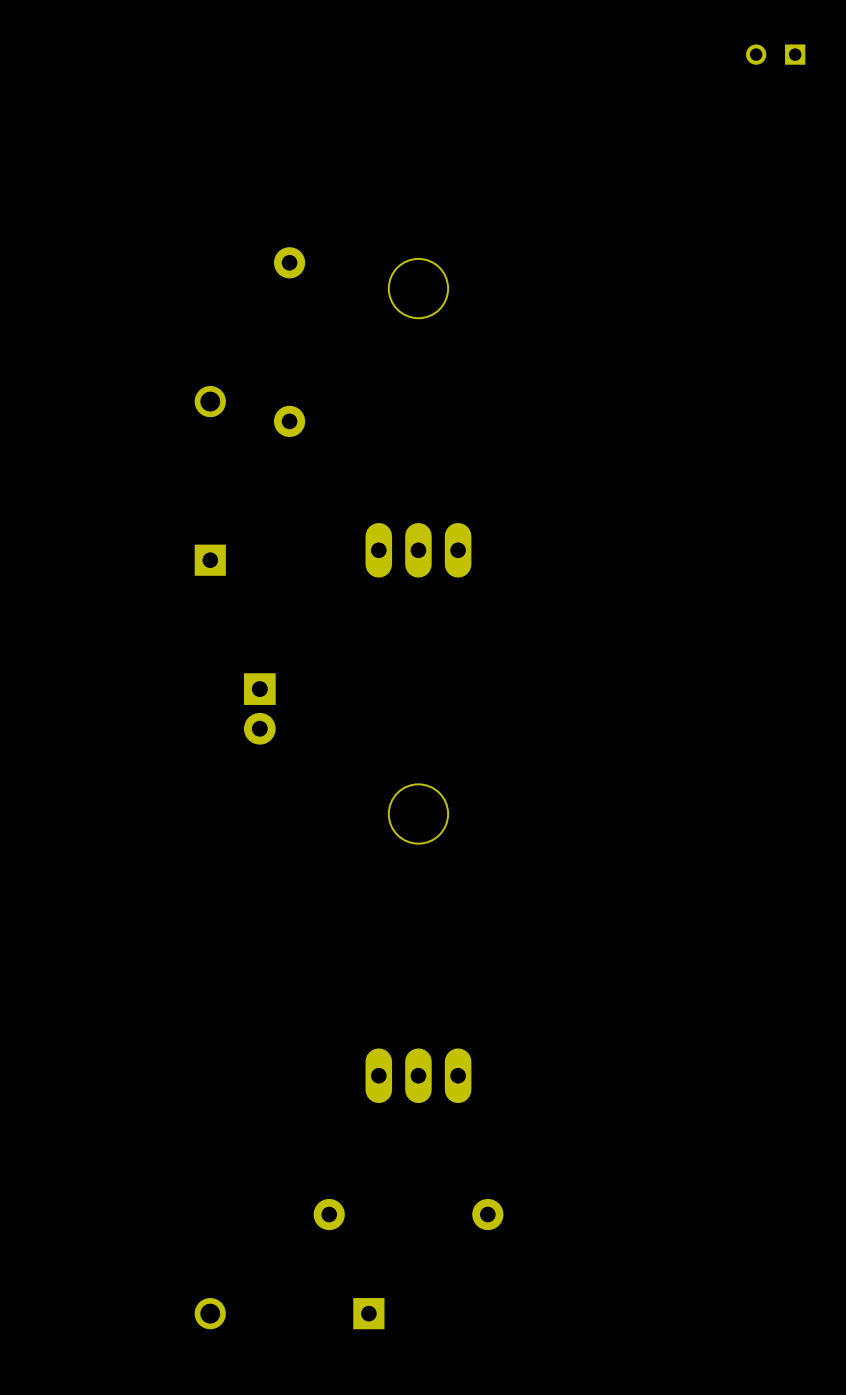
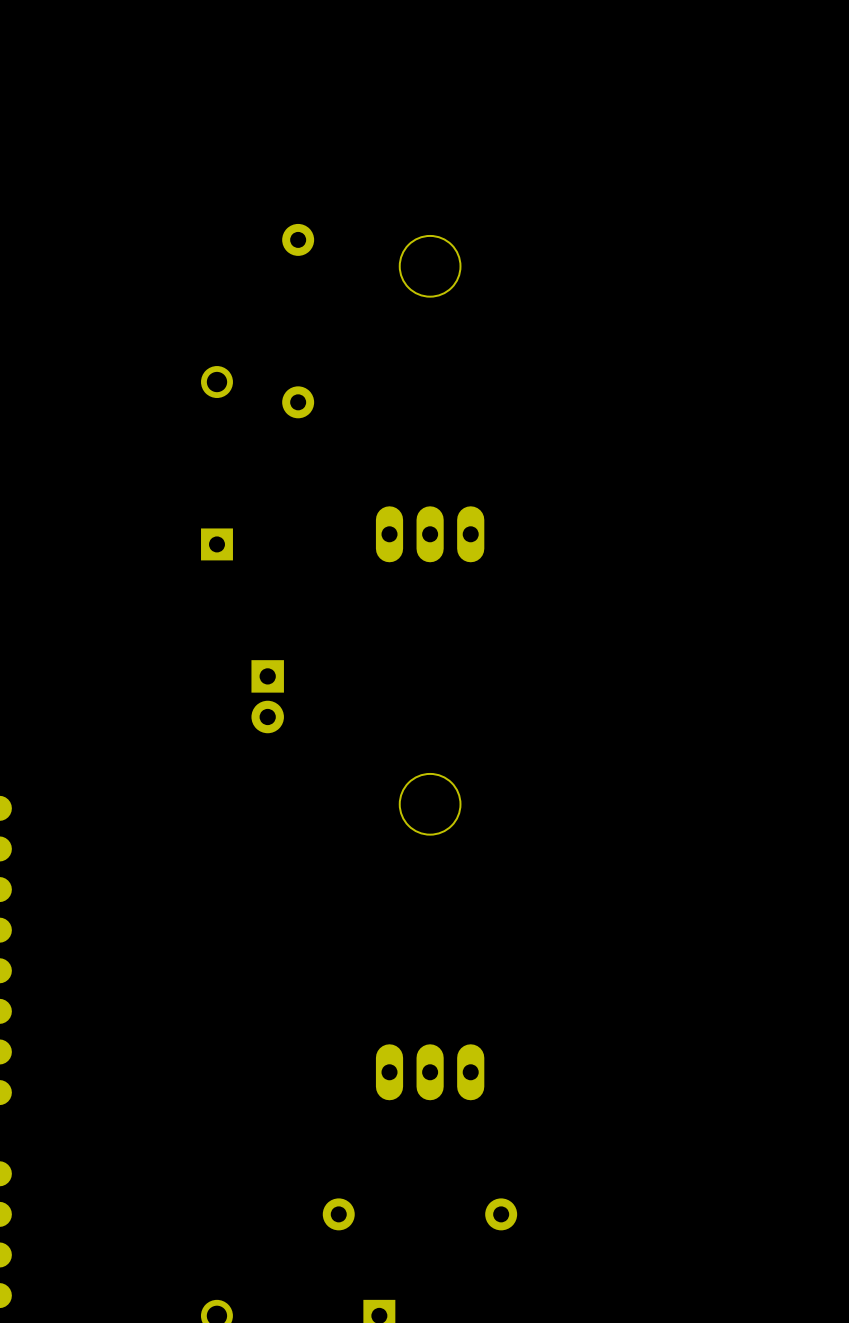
part: (775, 54) -> none

